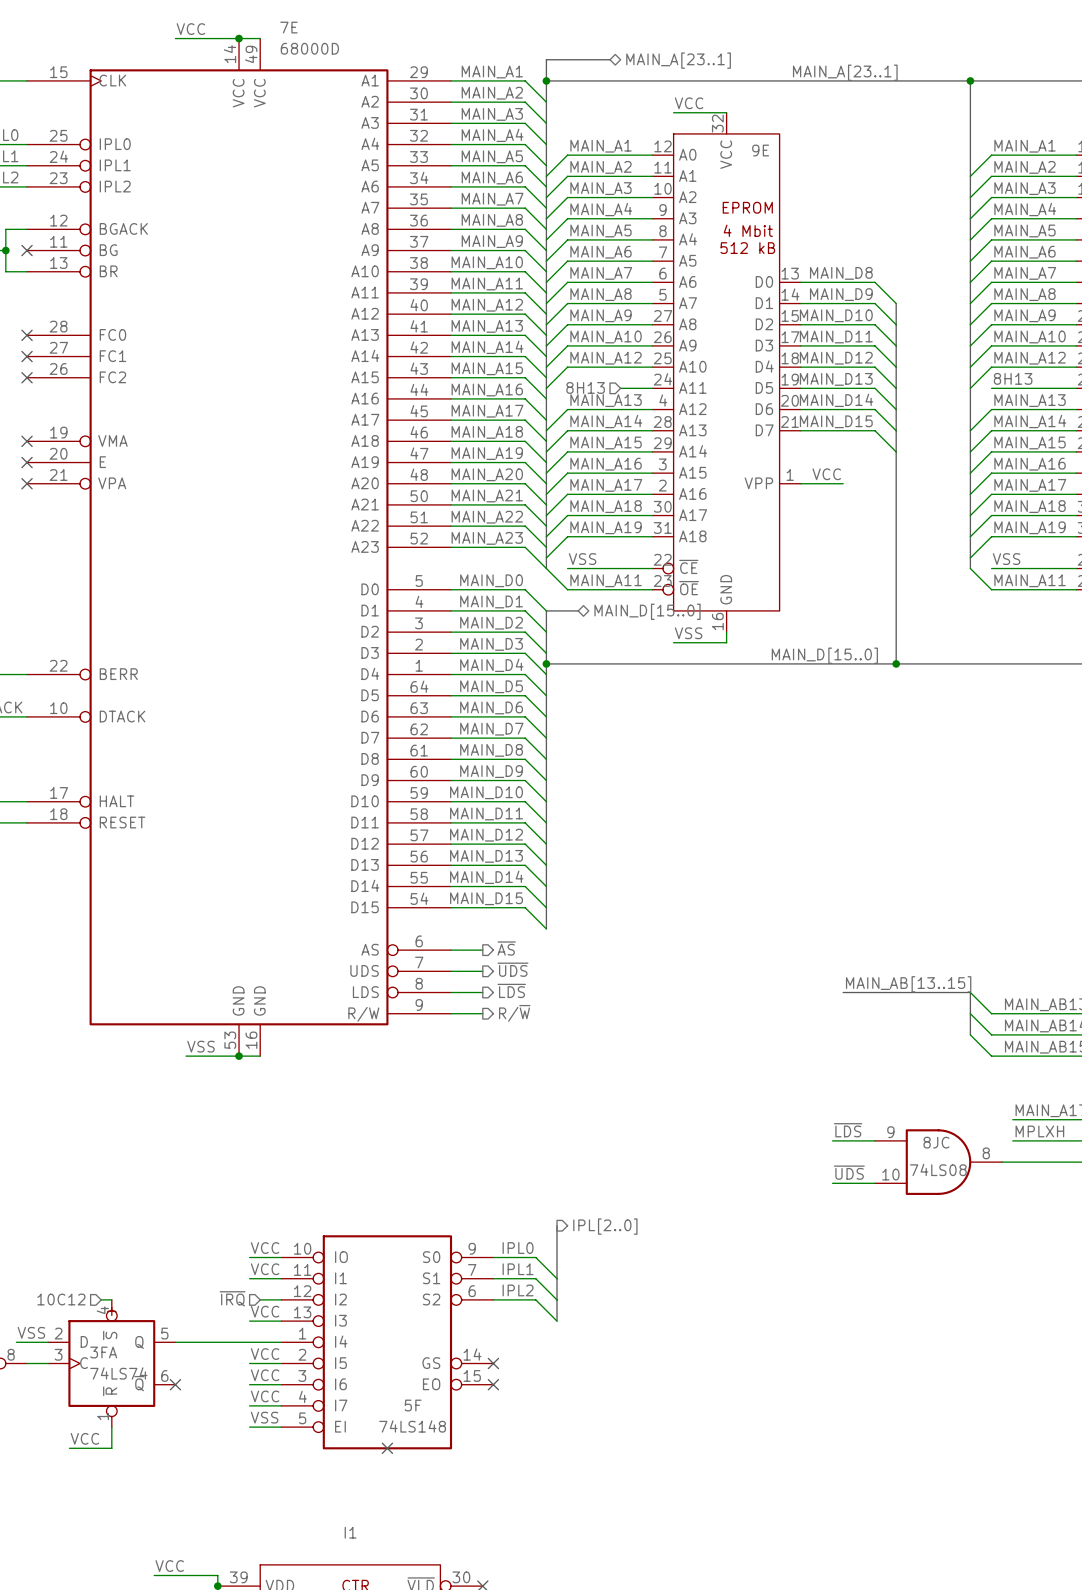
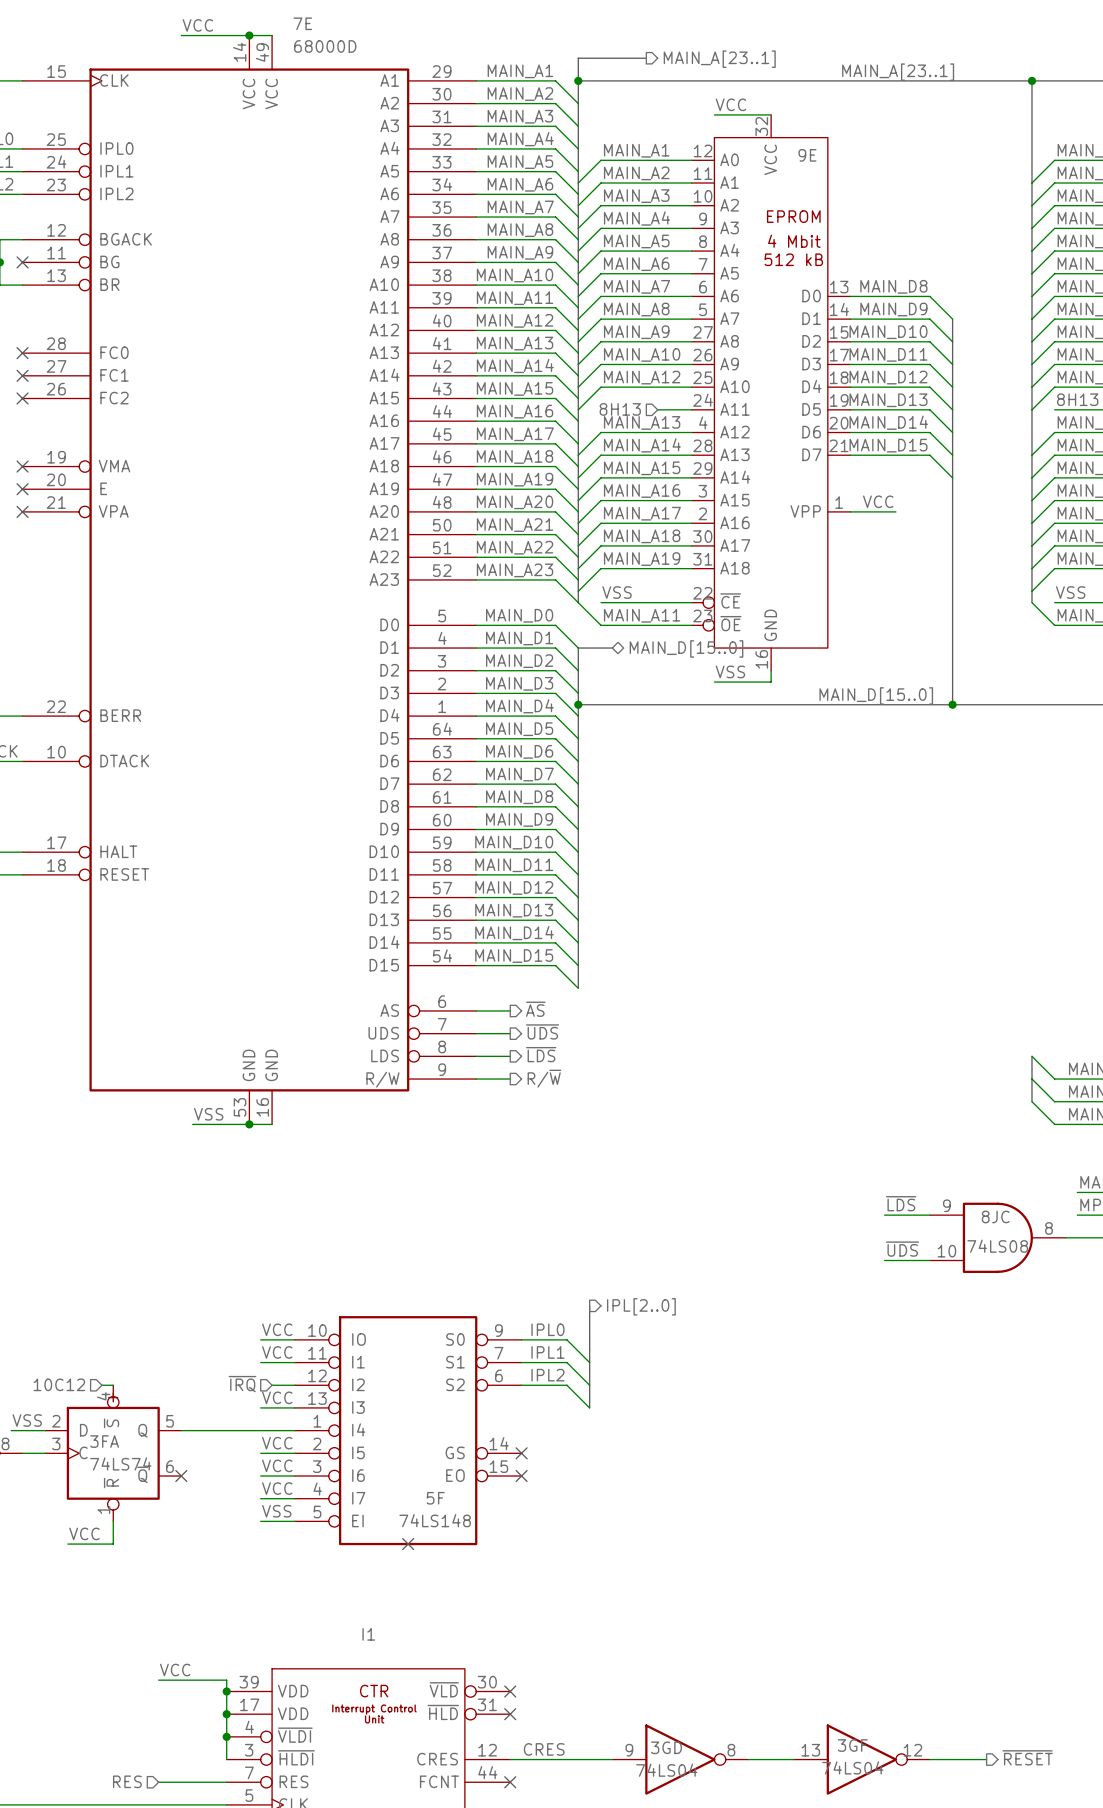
hierarchical label shape: bidirectional (678, 60) -> output (719, 59)
label: MAIN_AB[13..15] (908, 984) -> none
bus: (843, 992) (970, 992) -> none

